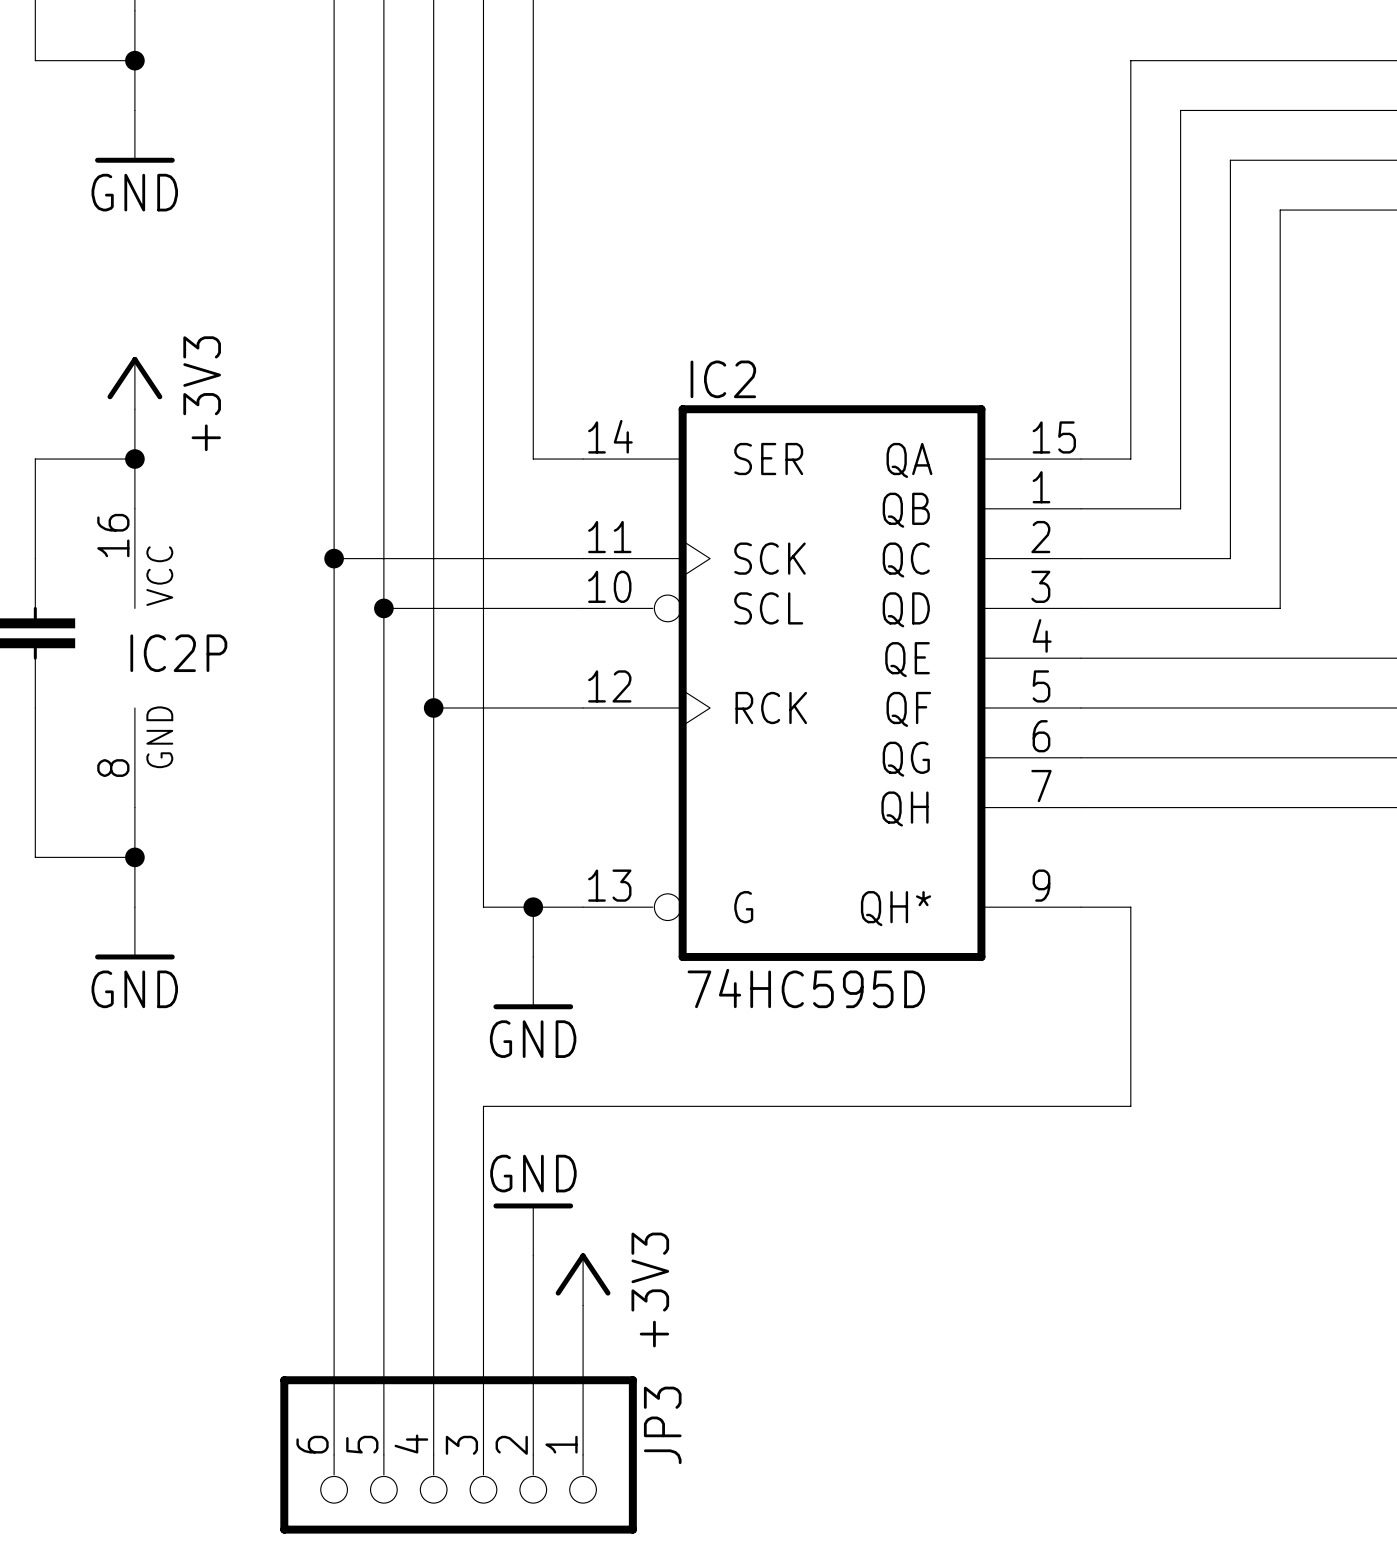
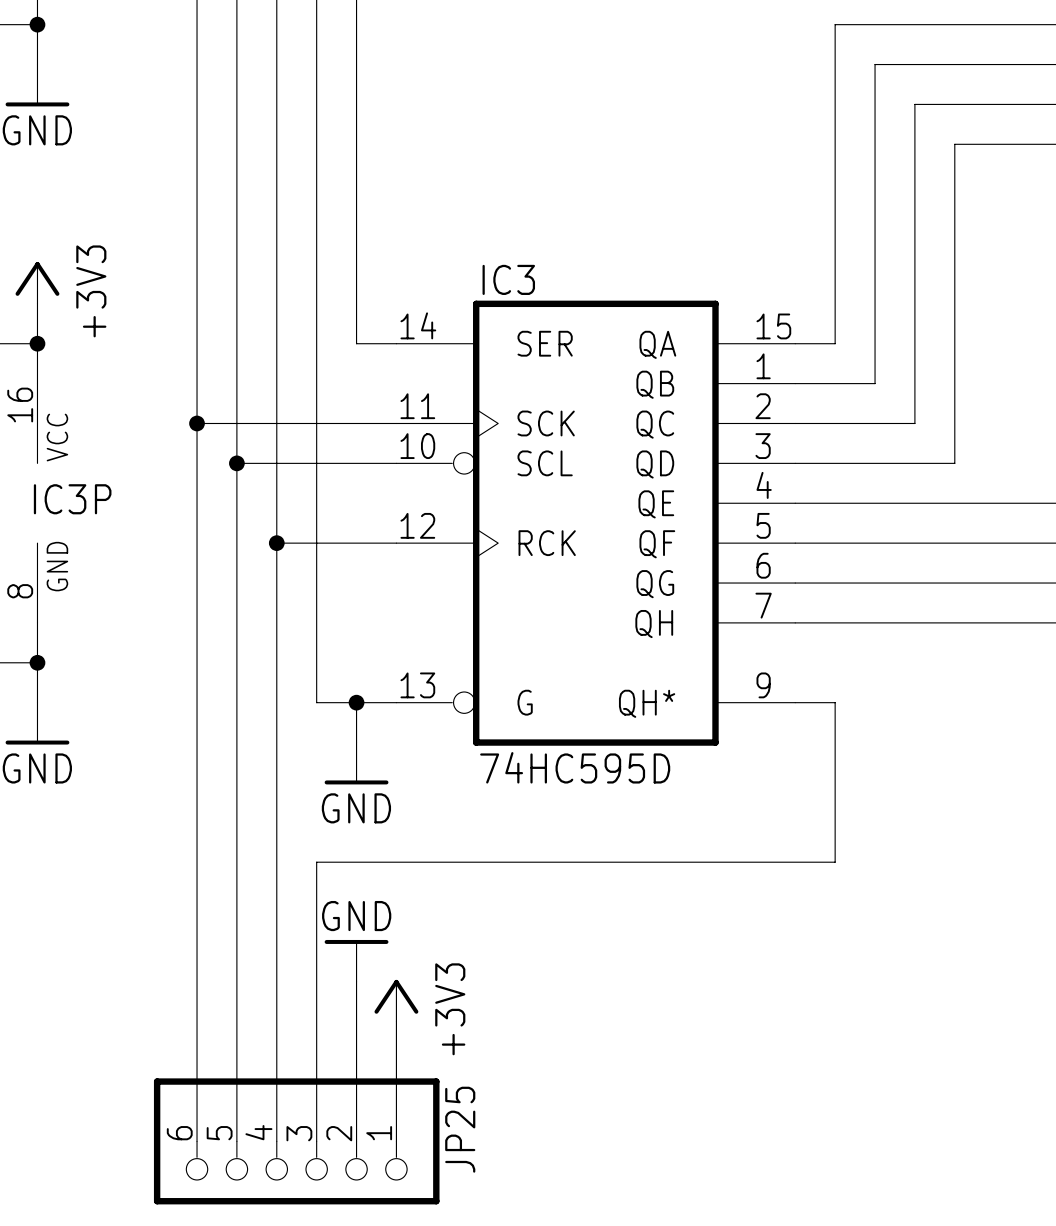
IC2 name: IC2 (723, 379) -> IC3 (508, 279)
IC2P name: IC2P (178, 653) -> IC3P (72, 499)
JP3 name: JP3 (662, 1425) -> JP25 (460, 1129)

